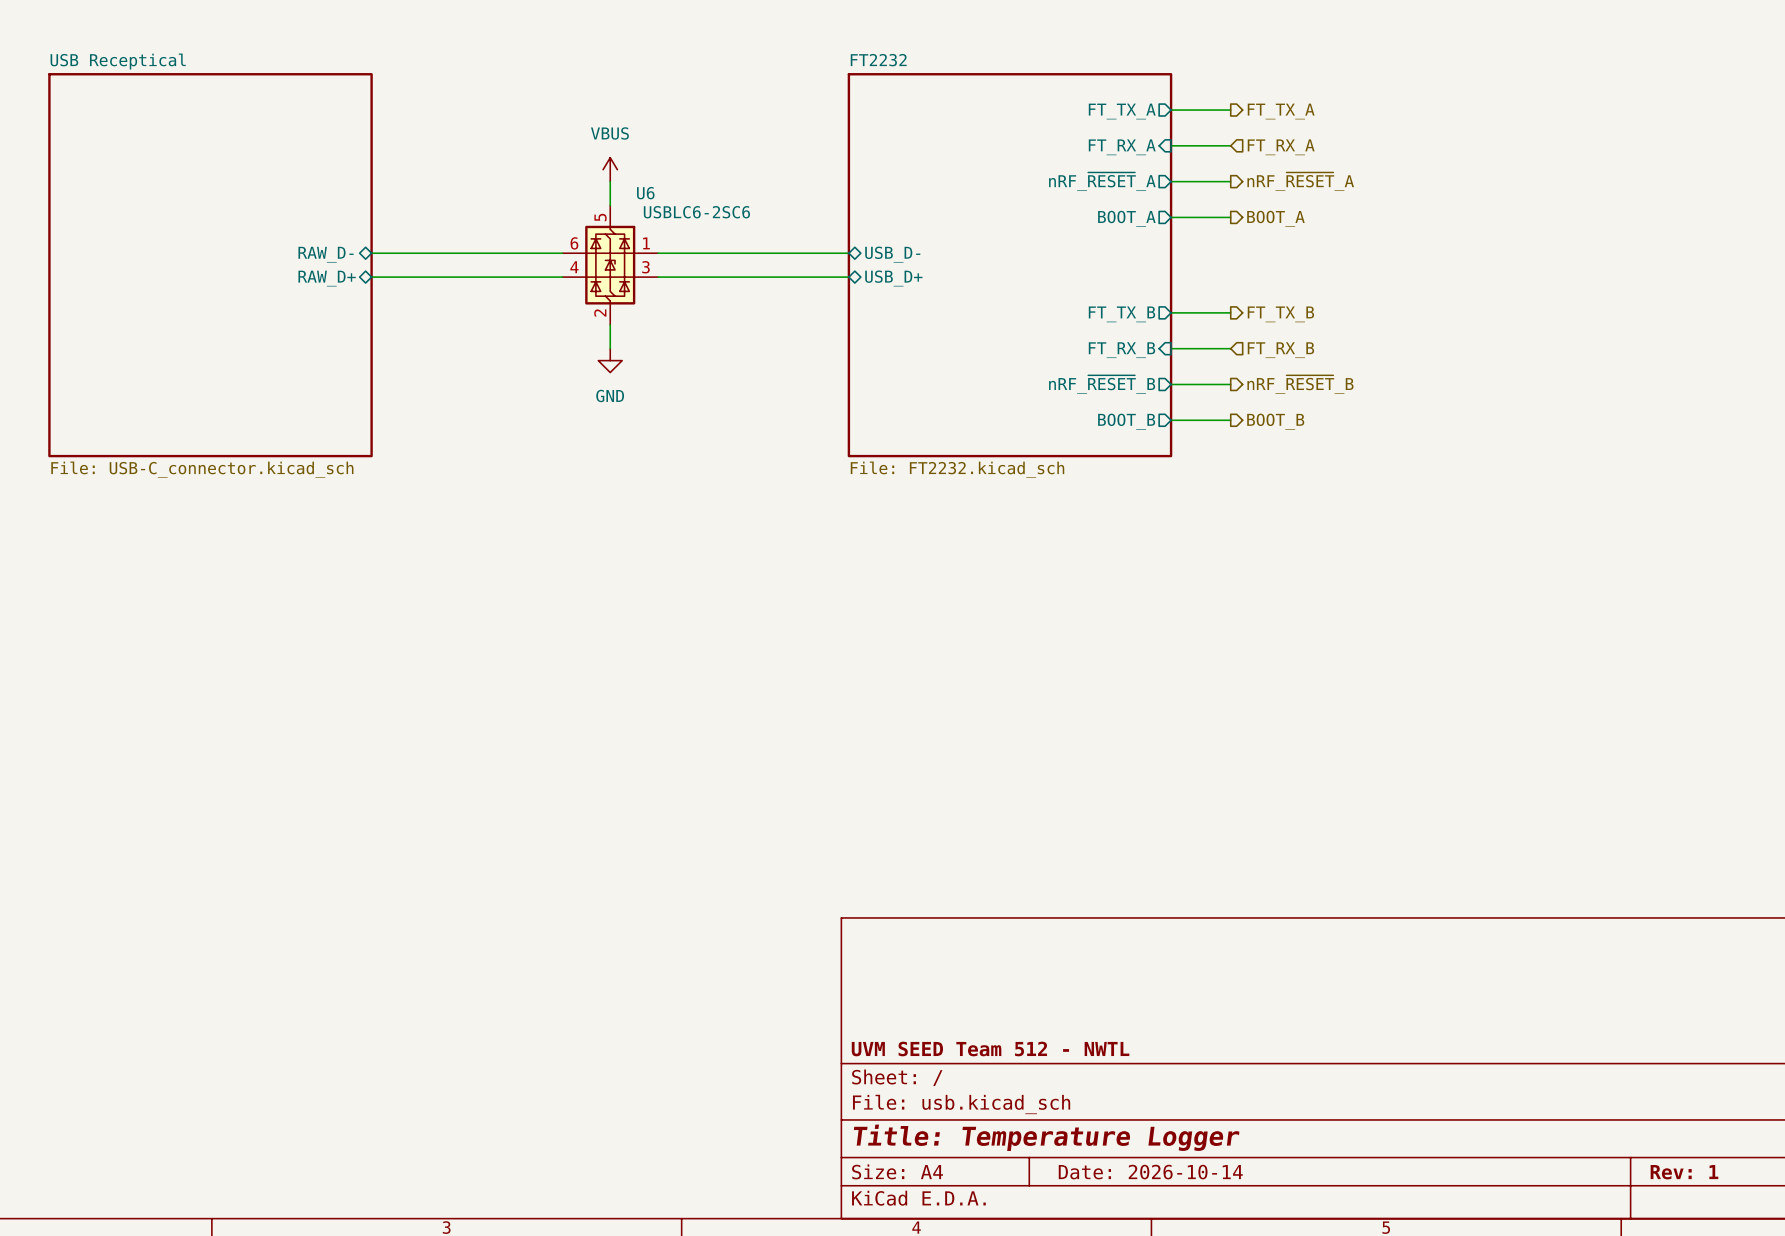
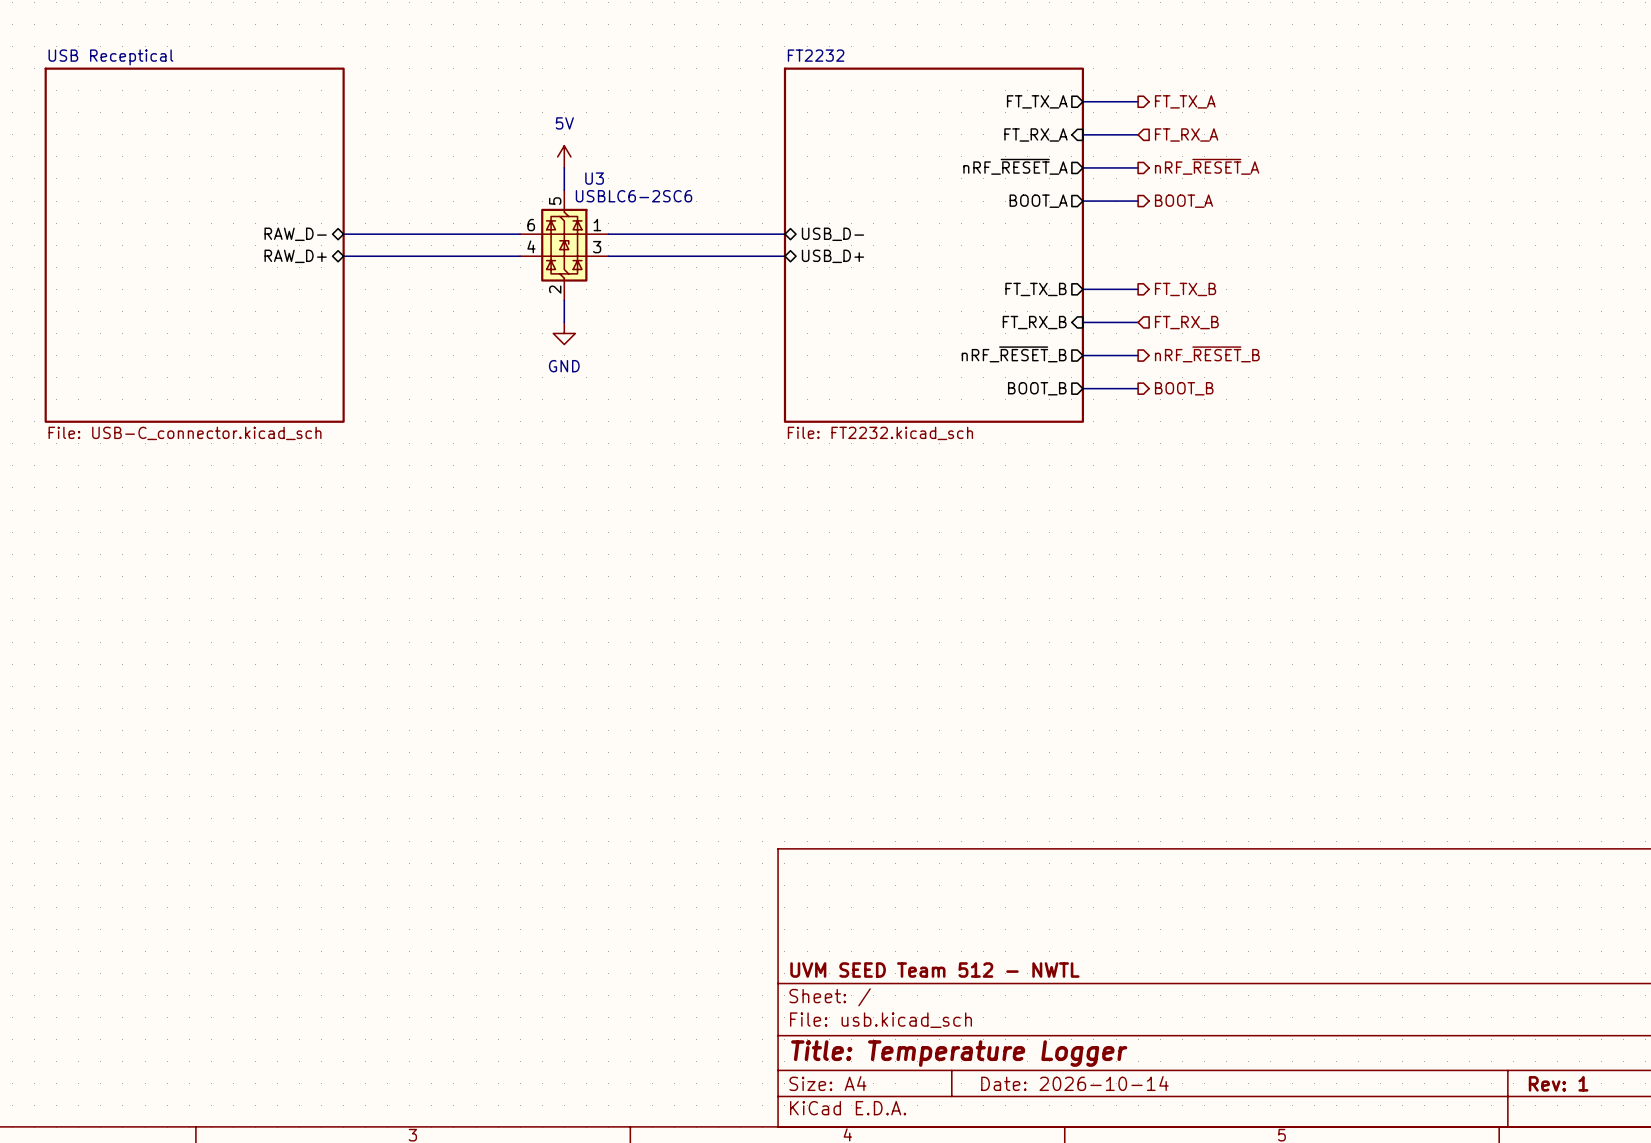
power symbol: VBUS (610, 169) -> 5V (564, 156)
U6 name: U6 (645, 193) -> U3 (594, 178)

